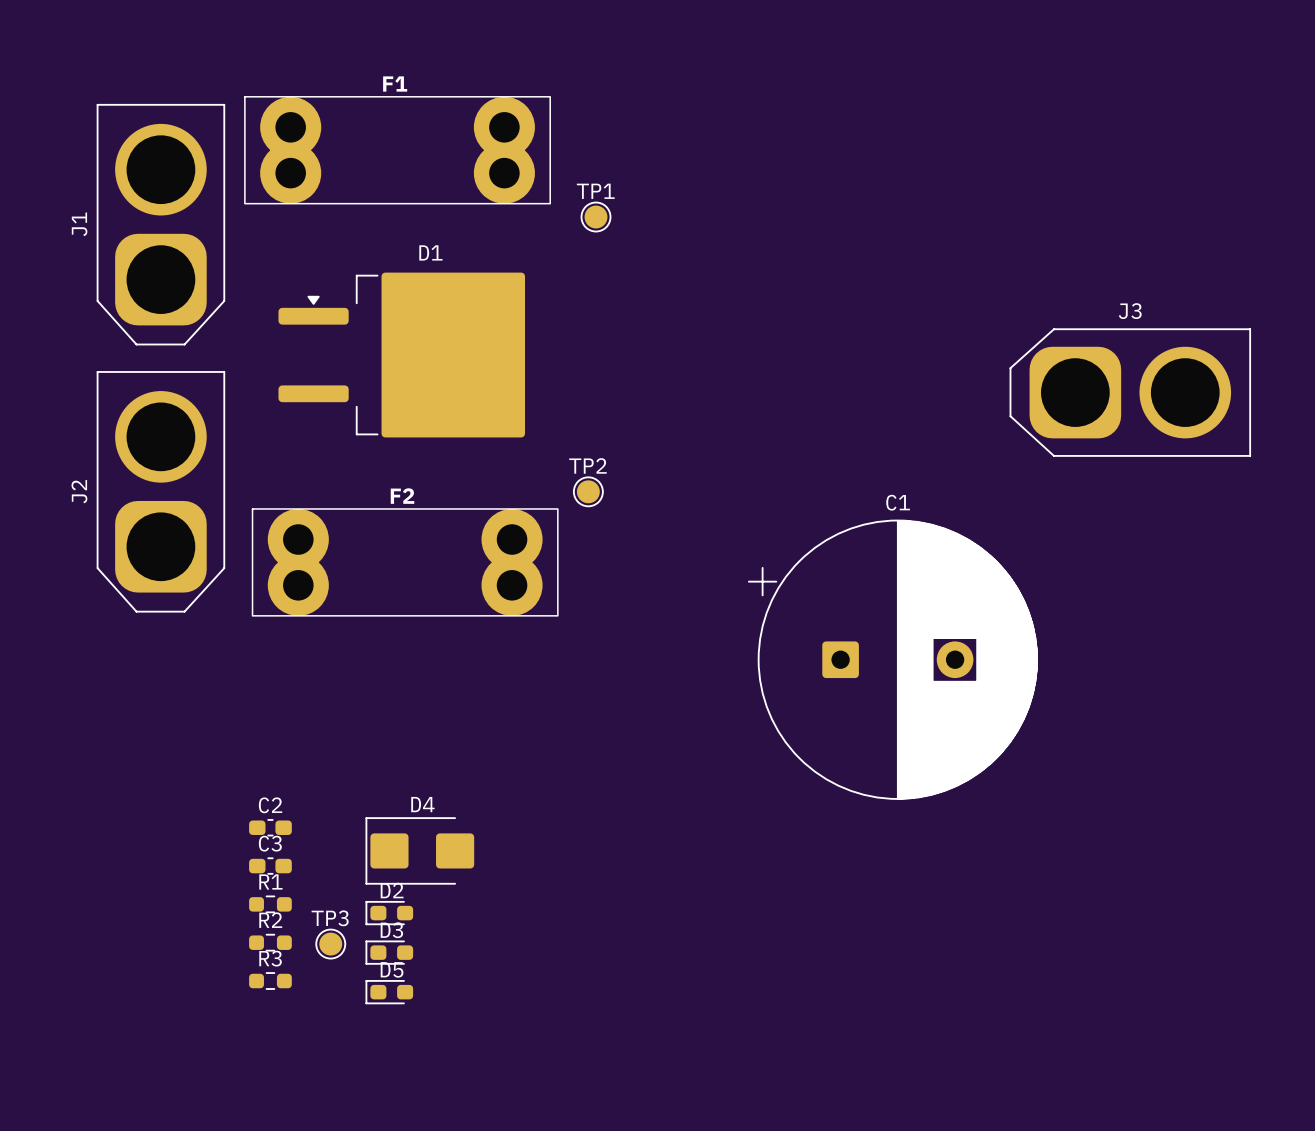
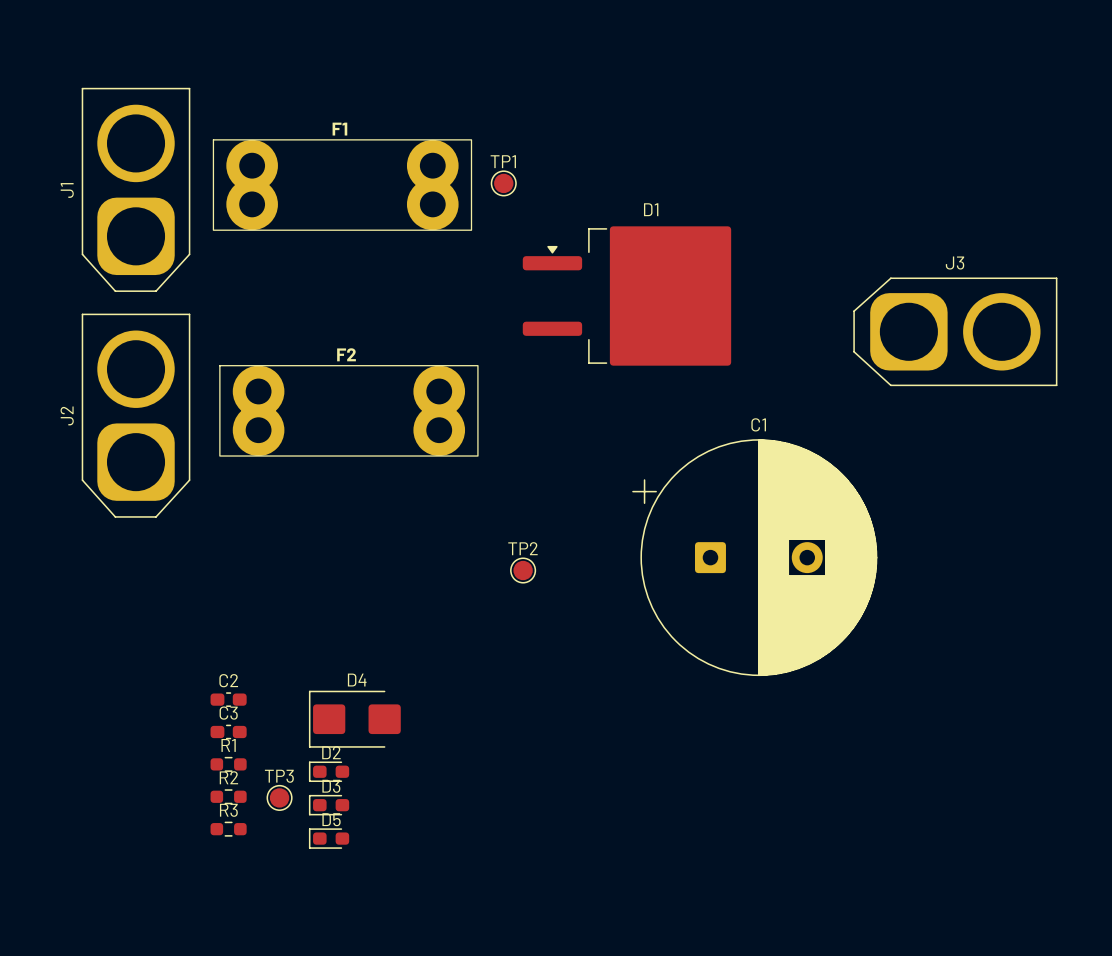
F1 position: (397, 150) -> (342, 185)
D1 position: (401, 355) -> (626, 296)
TP2 position: (588, 491) -> (523, 570)
F2 position: (405, 562) -> (348, 410)

